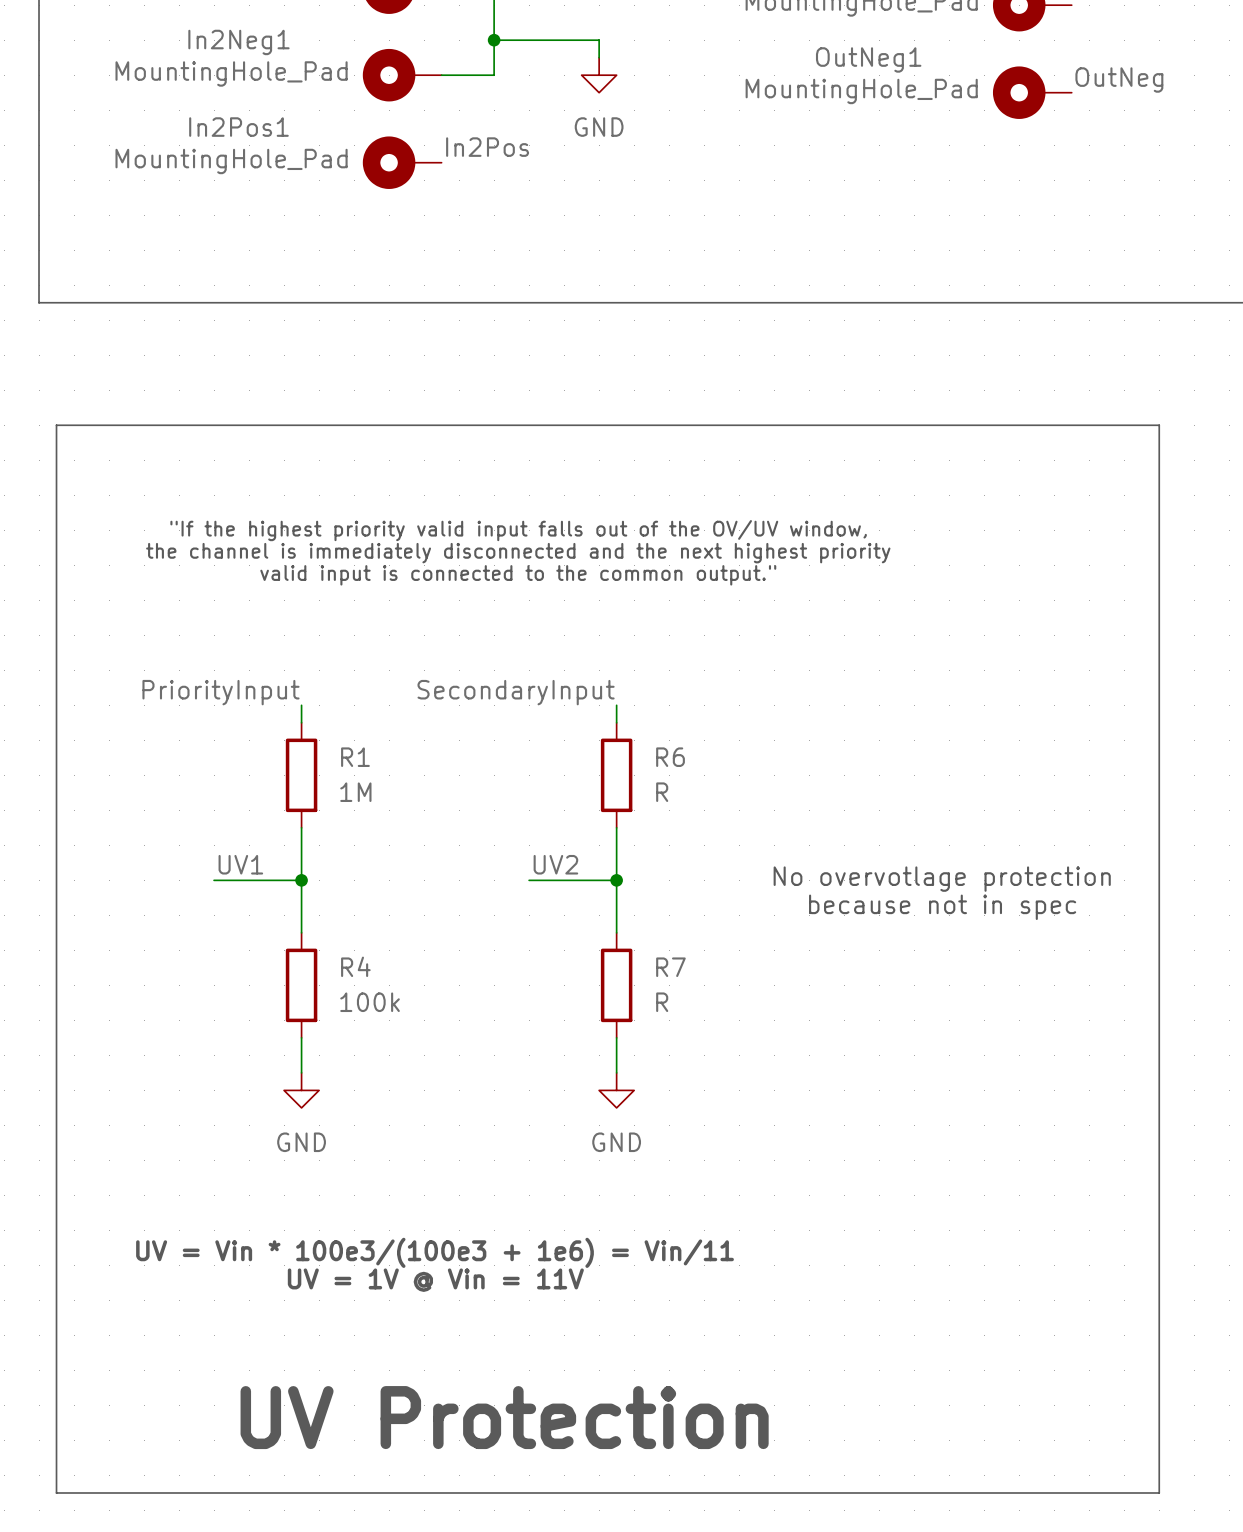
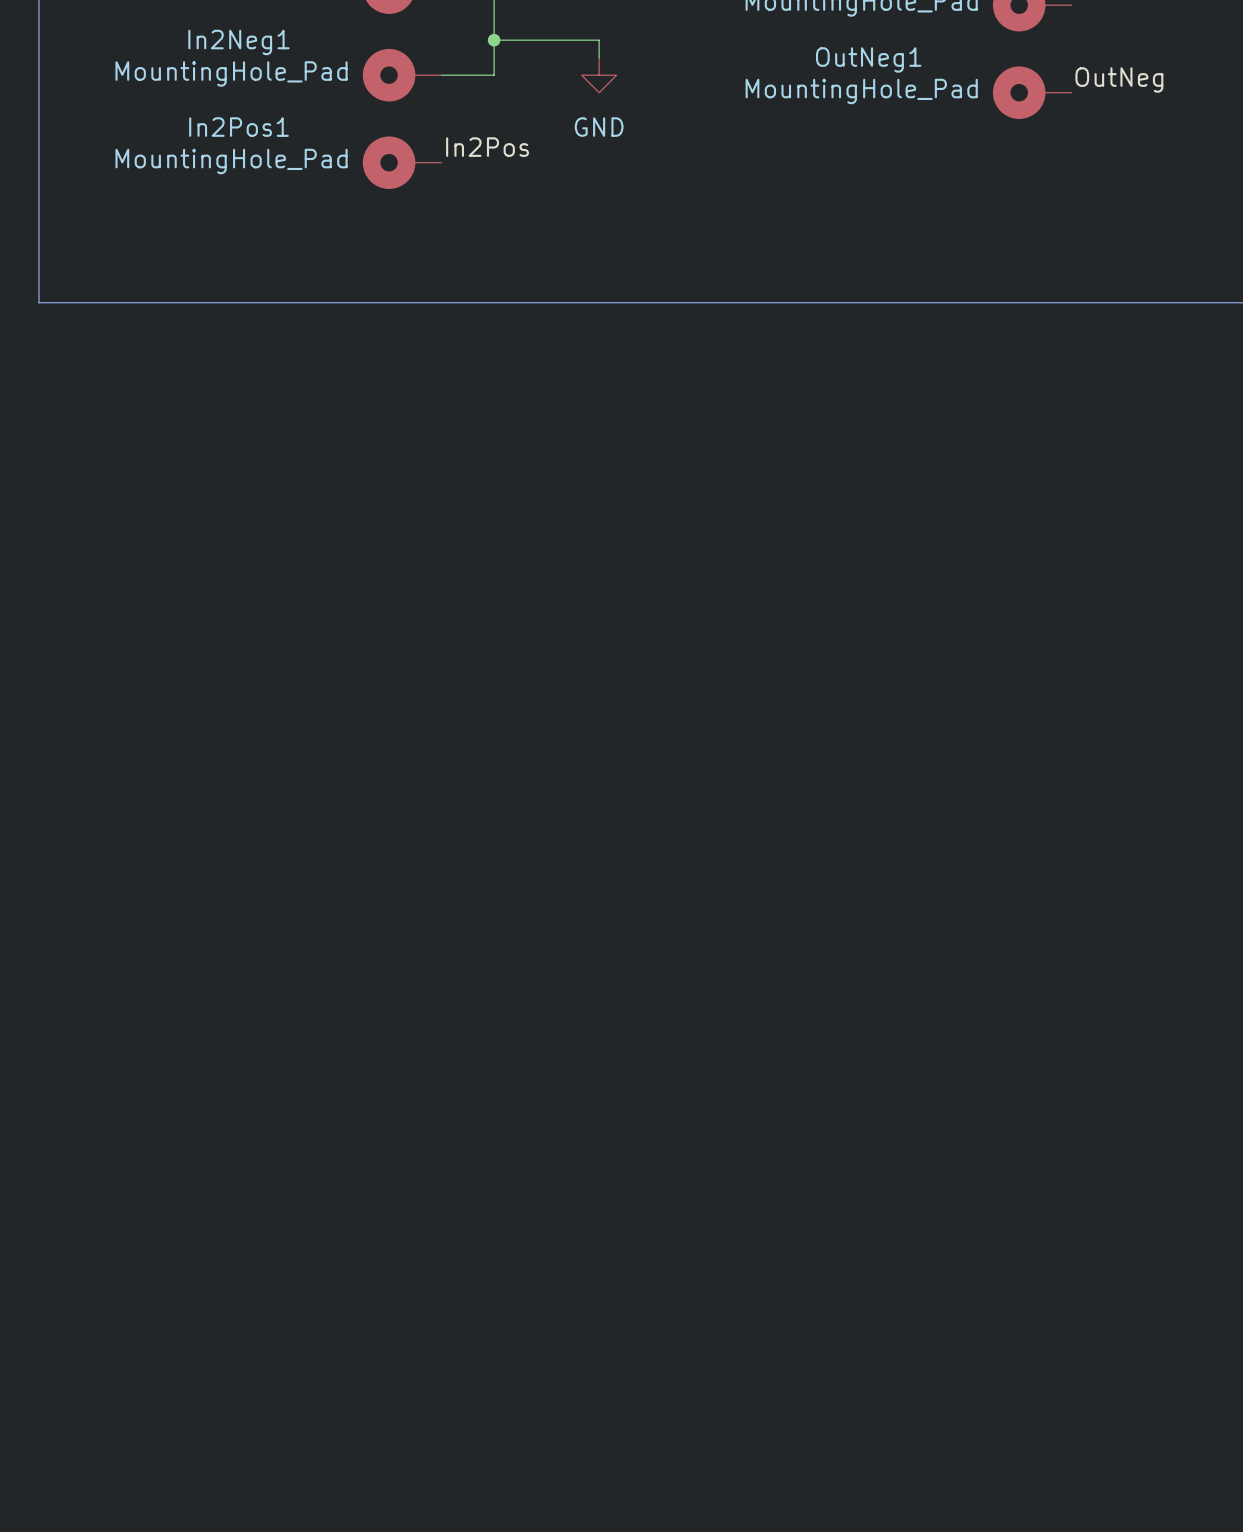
line: (56, 425) (1159, 425) (1159, 1492) (56, 1492) (56, 425) -> none
text: "If the highest priority valid input falls out of the OV/UV window, (518, 530) -> none
text: the channel is immediately disconnected and the next highest priority (518, 553) -> none
text: valid input is connected to the common output." (518, 575) -> none
label: PriorityInput (221, 692) -> none
label: SecondaryInput (516, 692) -> none
wire: (301, 705) (301, 722) -> none
wire: (616, 705) (616, 722) -> none
R1: 1M (301, 775) -> none
R6: R (616, 775) -> none
wire: (301, 827) (301, 932) -> none
wire: (616, 827) (616, 932) -> none
label: UV1 (240, 864) -> none
label: UV2 (555, 864) -> none
text: No overvotlage protection (942, 879) -> none
wire: (214, 880) (301, 880) -> none
junction: (301, 880) -> none
wire: (529, 880) (616, 880) -> none
junction: (616, 880) -> none
text: because not in spec (942, 907) -> none
R4: 100k (301, 985) -> none
R7: R (616, 985) -> none
wire: (301, 1037) (301, 1072) -> none
wire: (616, 1037) (616, 1072) -> none
power symbol: GND (301, 1090) -> none
power symbol: GND (616, 1090) -> none
text: UV = Vin * 100e3/(100e3 + 1e6) = Vin/11 (435, 1252) -> none
text: UV = 1V @ Vin = 11V (435, 1280) -> none
text: UV Protection (504, 1417) -> none

